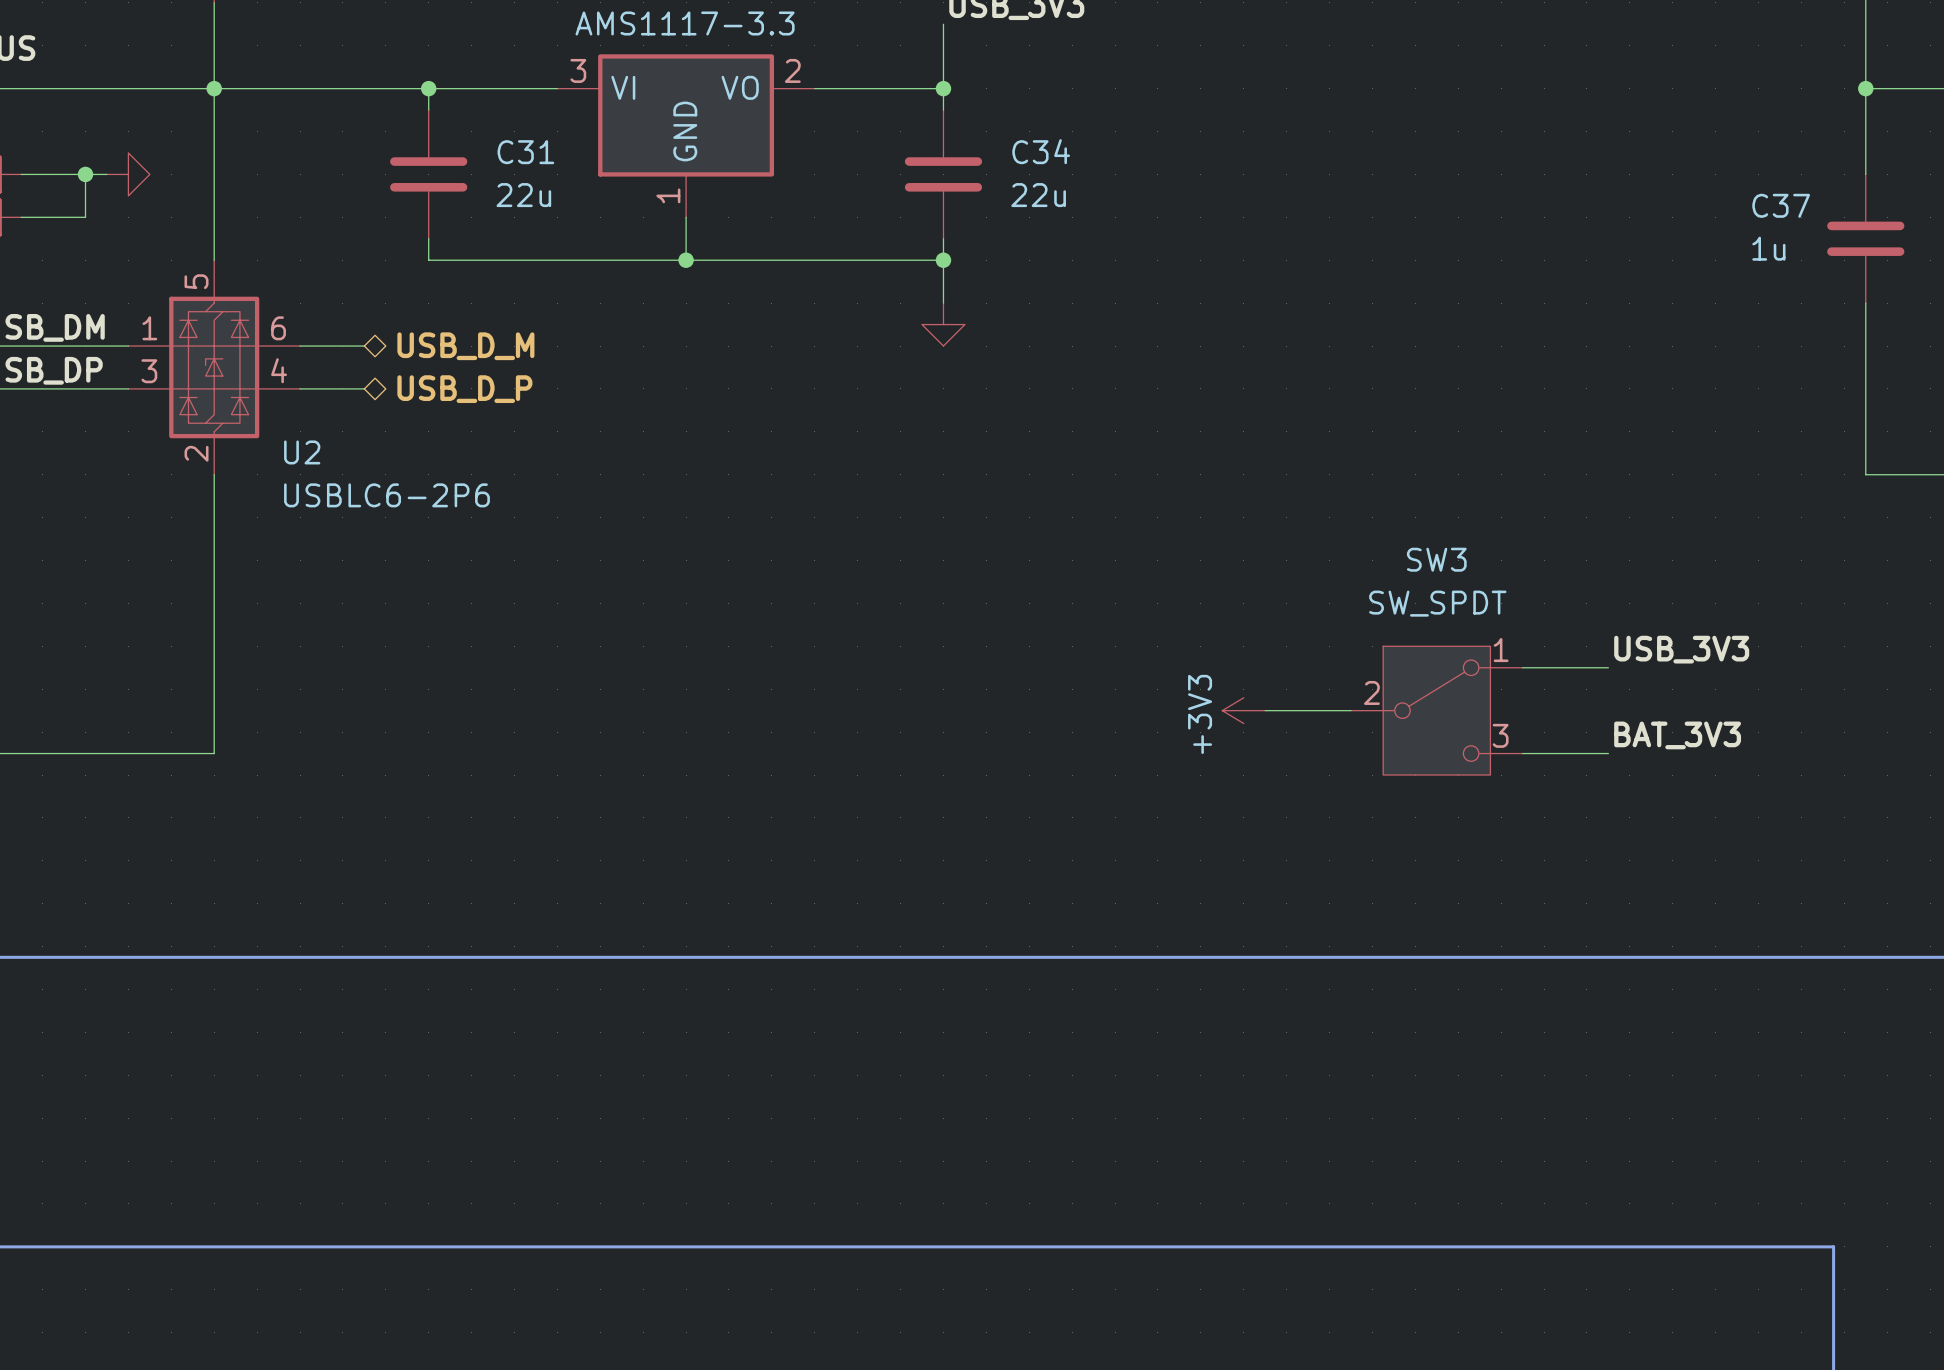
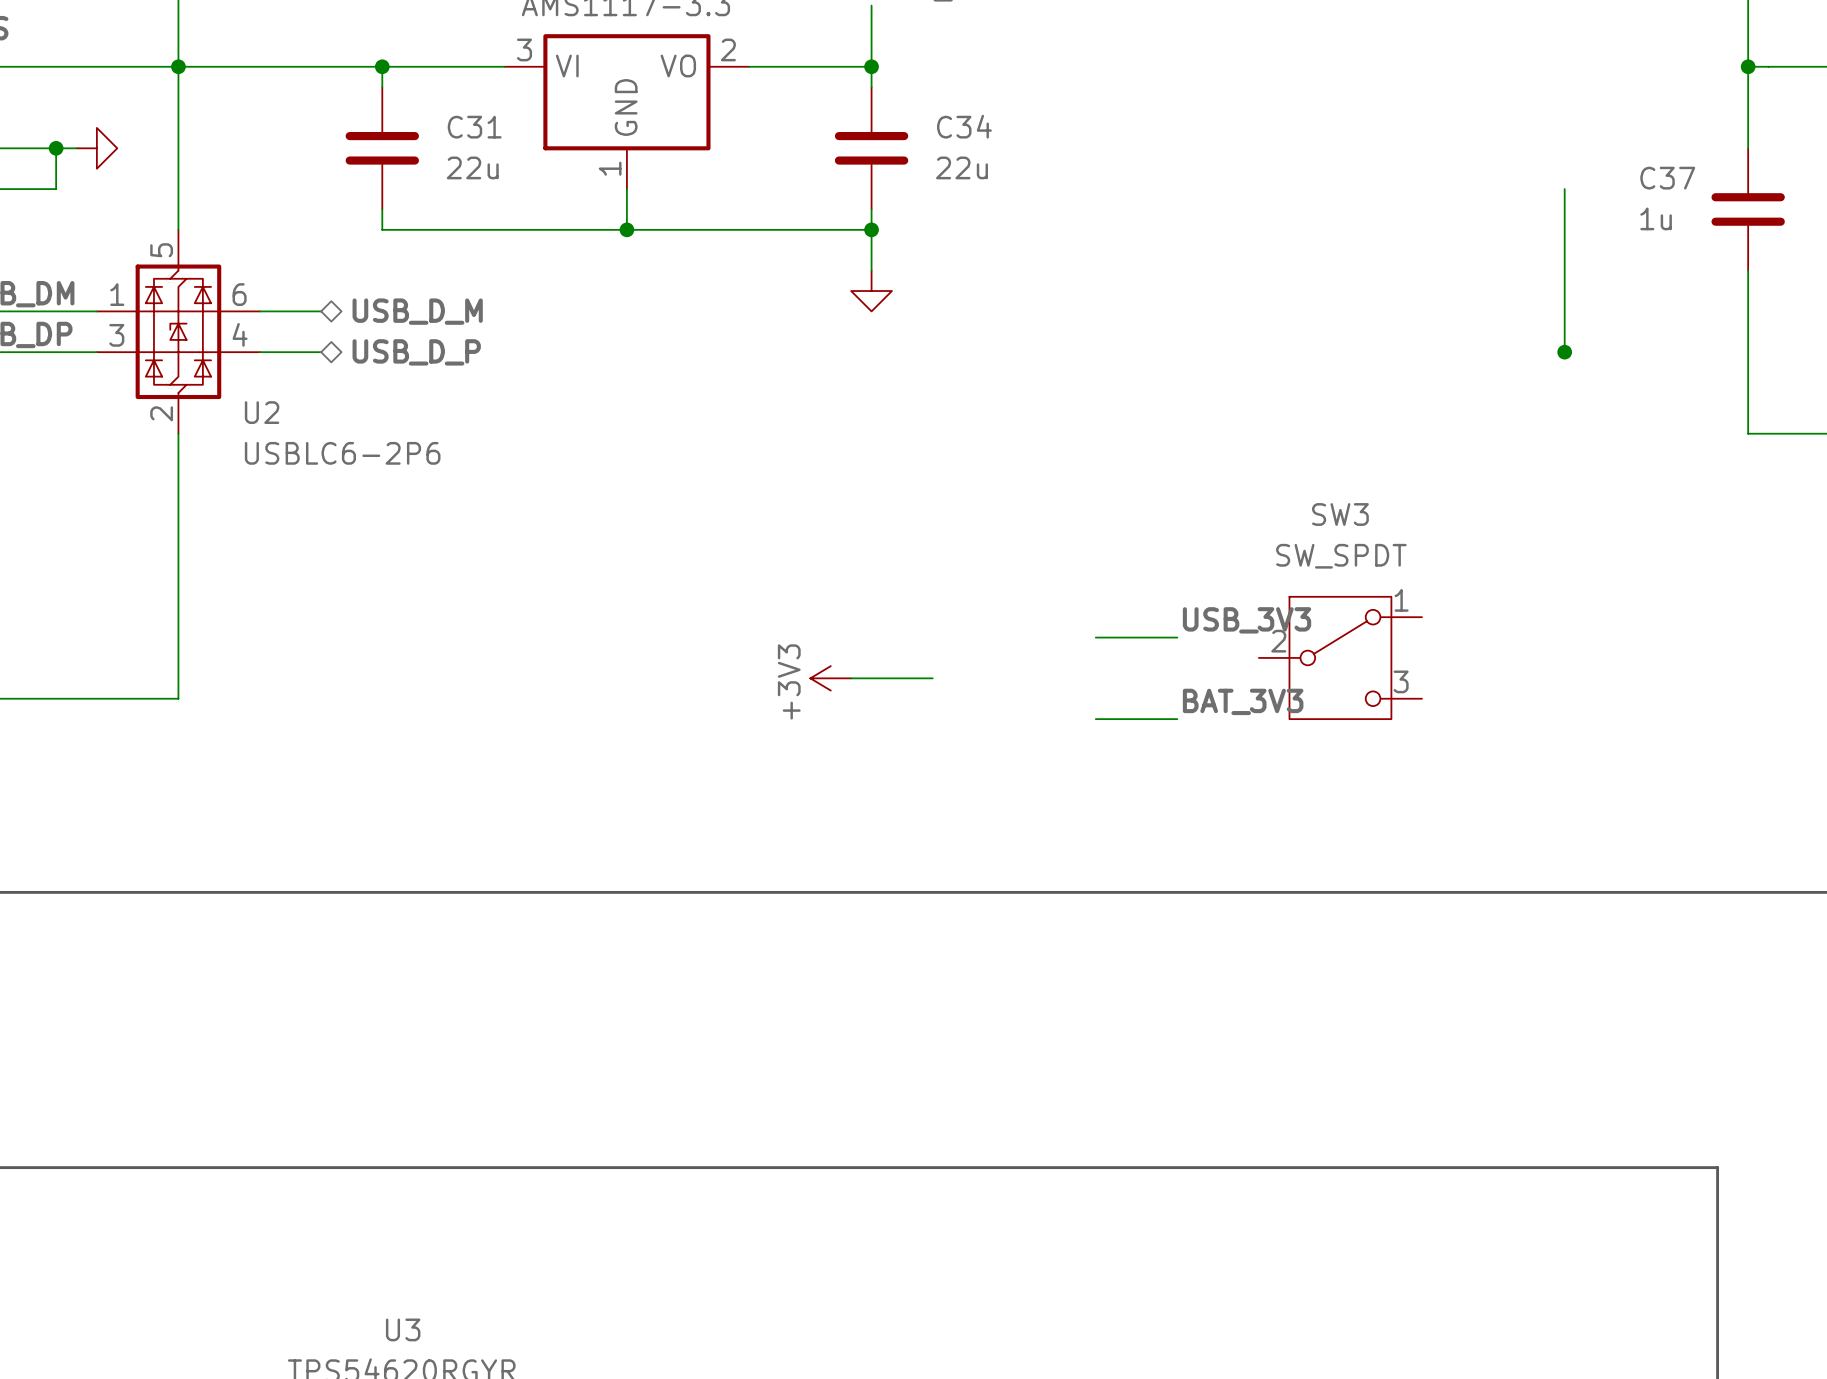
wire: none -> (1564, 189) (1564, 352)
junction: none -> (1564, 352)
label position: USB_3V3 (1681, 649) -> USB_3V3 (1247, 620)
wire: (1522, 667) (1608, 667) -> (1095, 637) (1177, 637)
power symbol position: +3V3 (1243, 710) -> +3V3 (830, 678)
wire: (1265, 710) (1351, 710) -> (851, 678) (932, 678)
label position: BAT_3V3 (1677, 735) -> BAT_3V3 (1243, 701)
wire: (1522, 753) (1608, 753) -> (1095, 719) (1177, 719)

